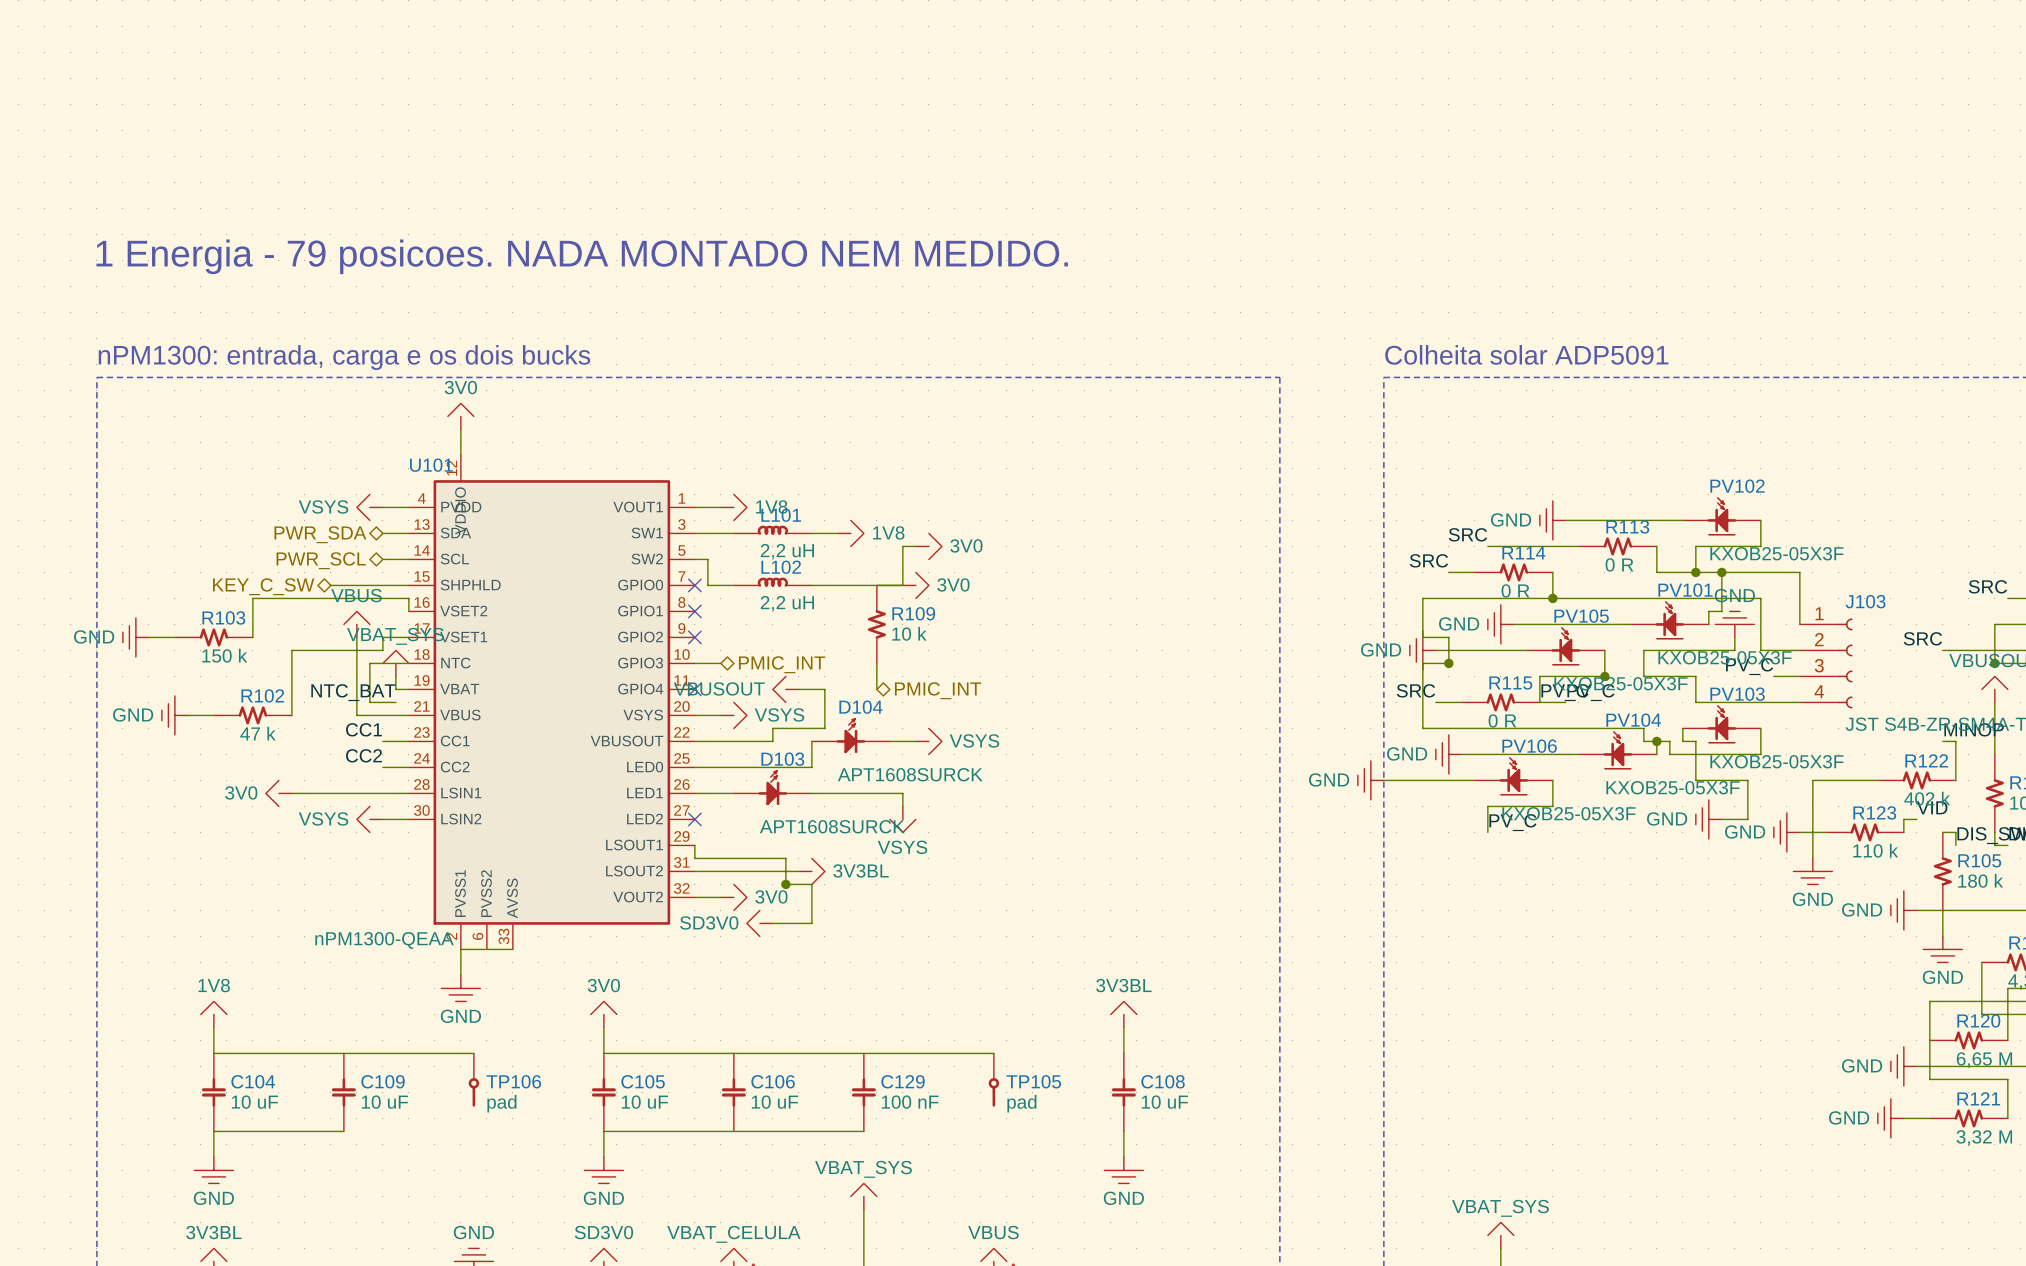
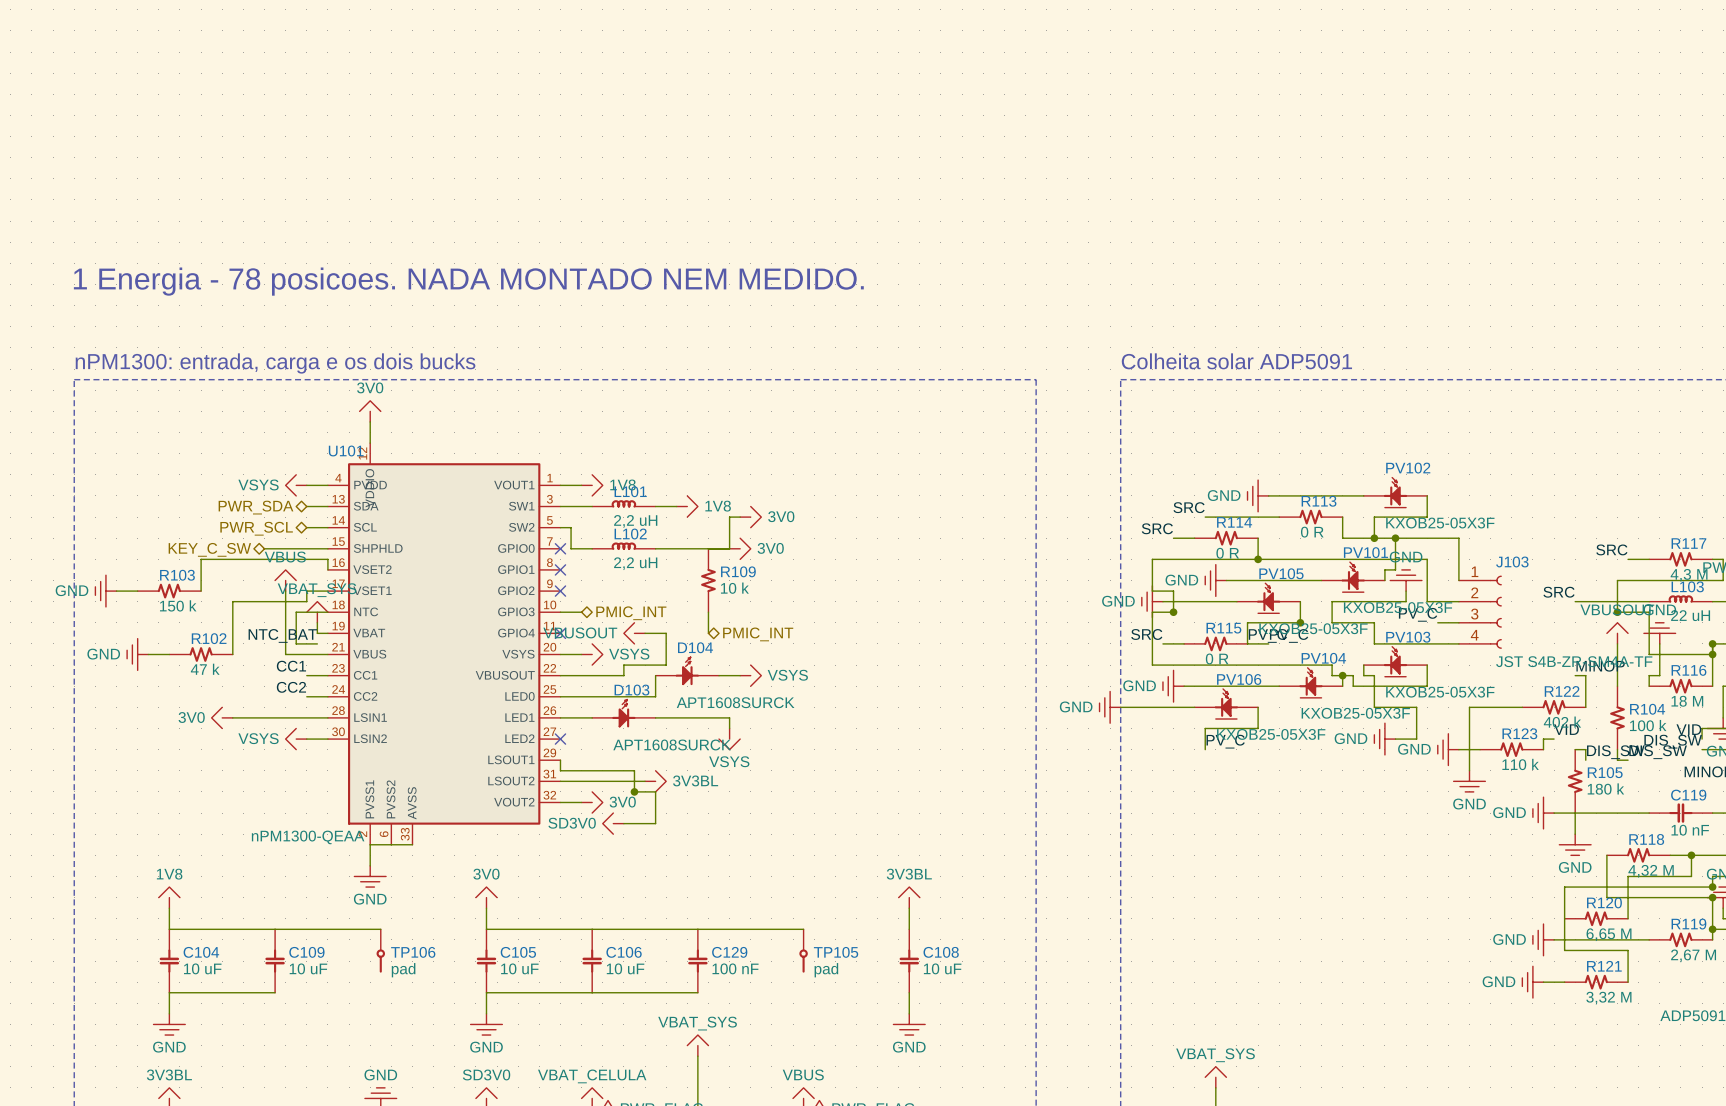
text: 1 Energia - 79 posicoes. NADA MONTADO NEM MEDIDO. (582, 256) -> 1 Energia - 78 posicoes. NADA MONTADO NEM MEDIDO. (468, 281)

